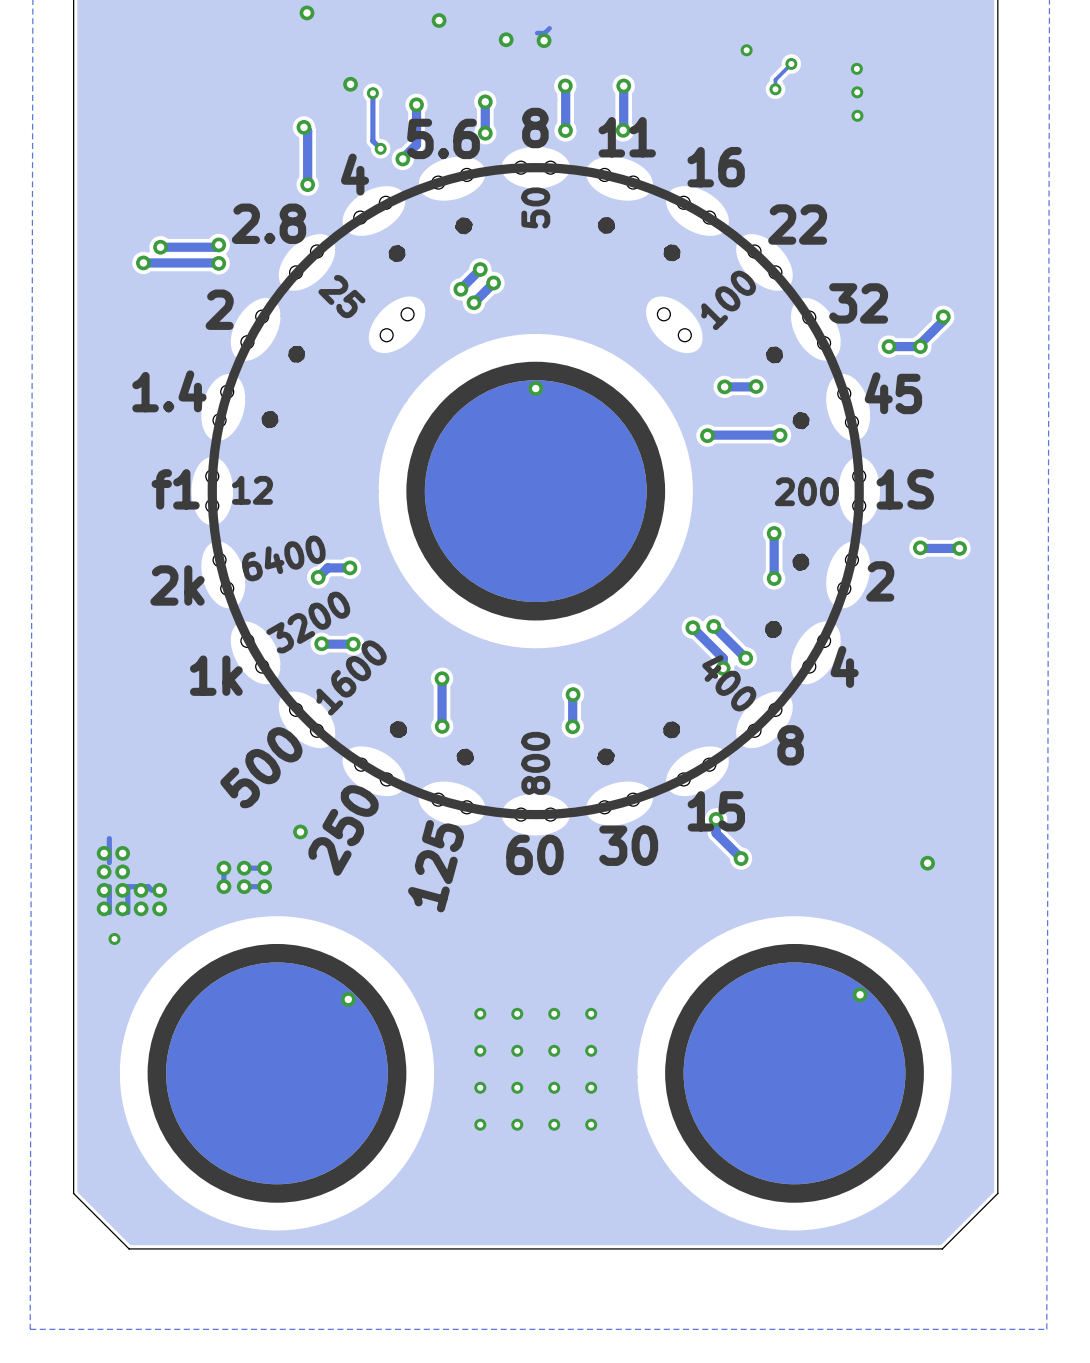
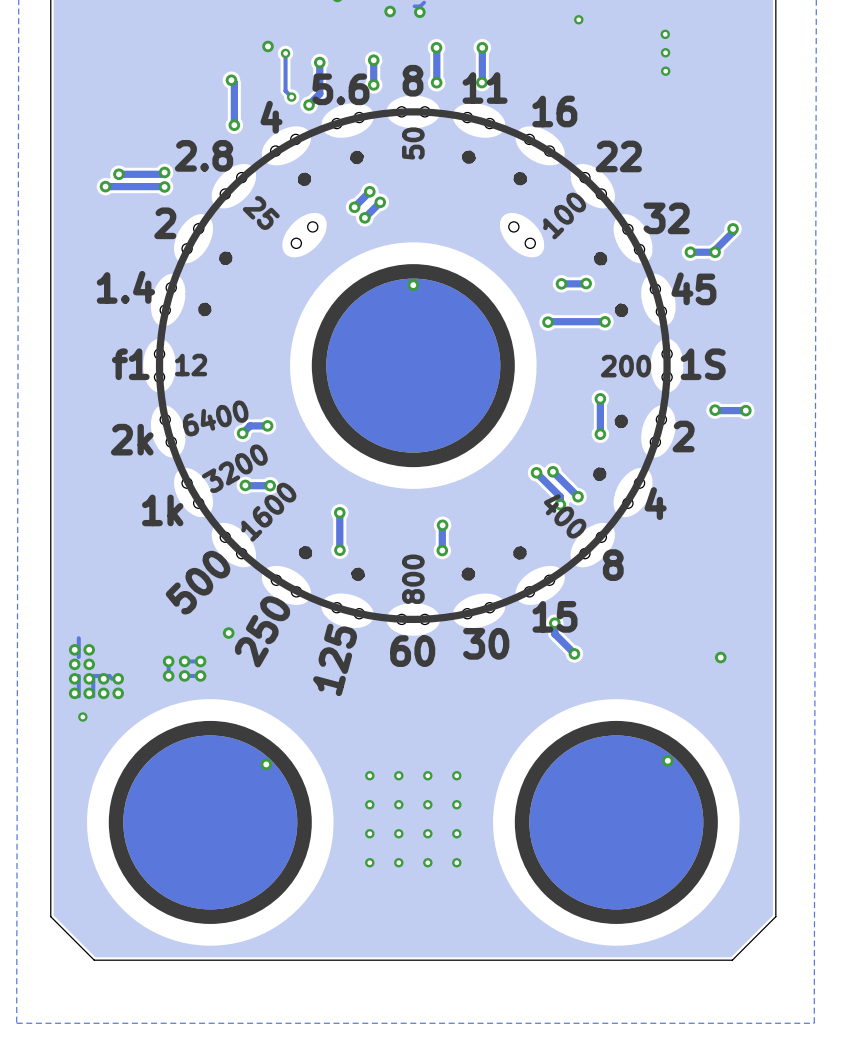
track: (791, 63) (775, 79) (775, 89) -> none
via: (791, 63) -> none
via: (775, 89) -> none

